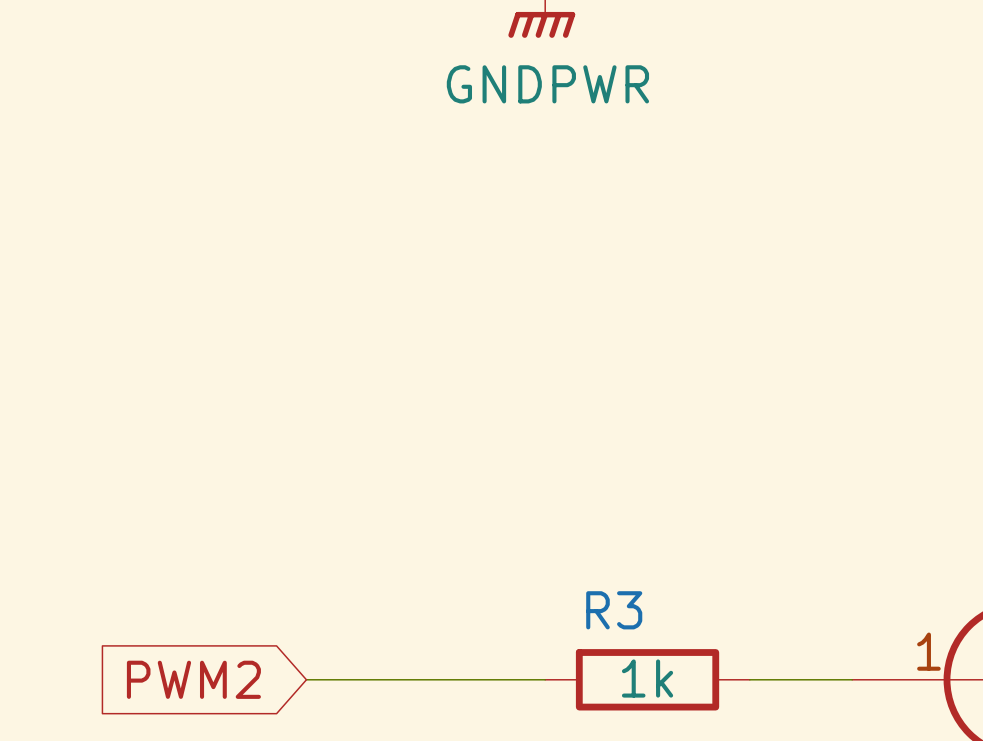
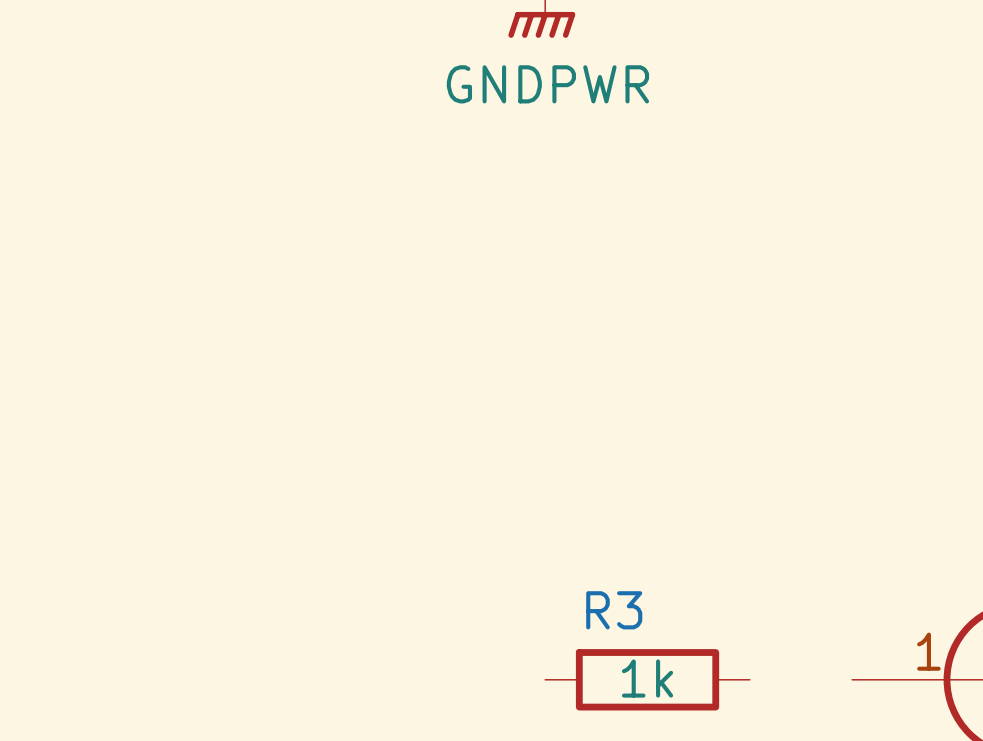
global label: PWM2 (193, 679) -> none
wire: (306, 679) (545, 679) -> none
wire: (749, 679) (852, 679) -> none

